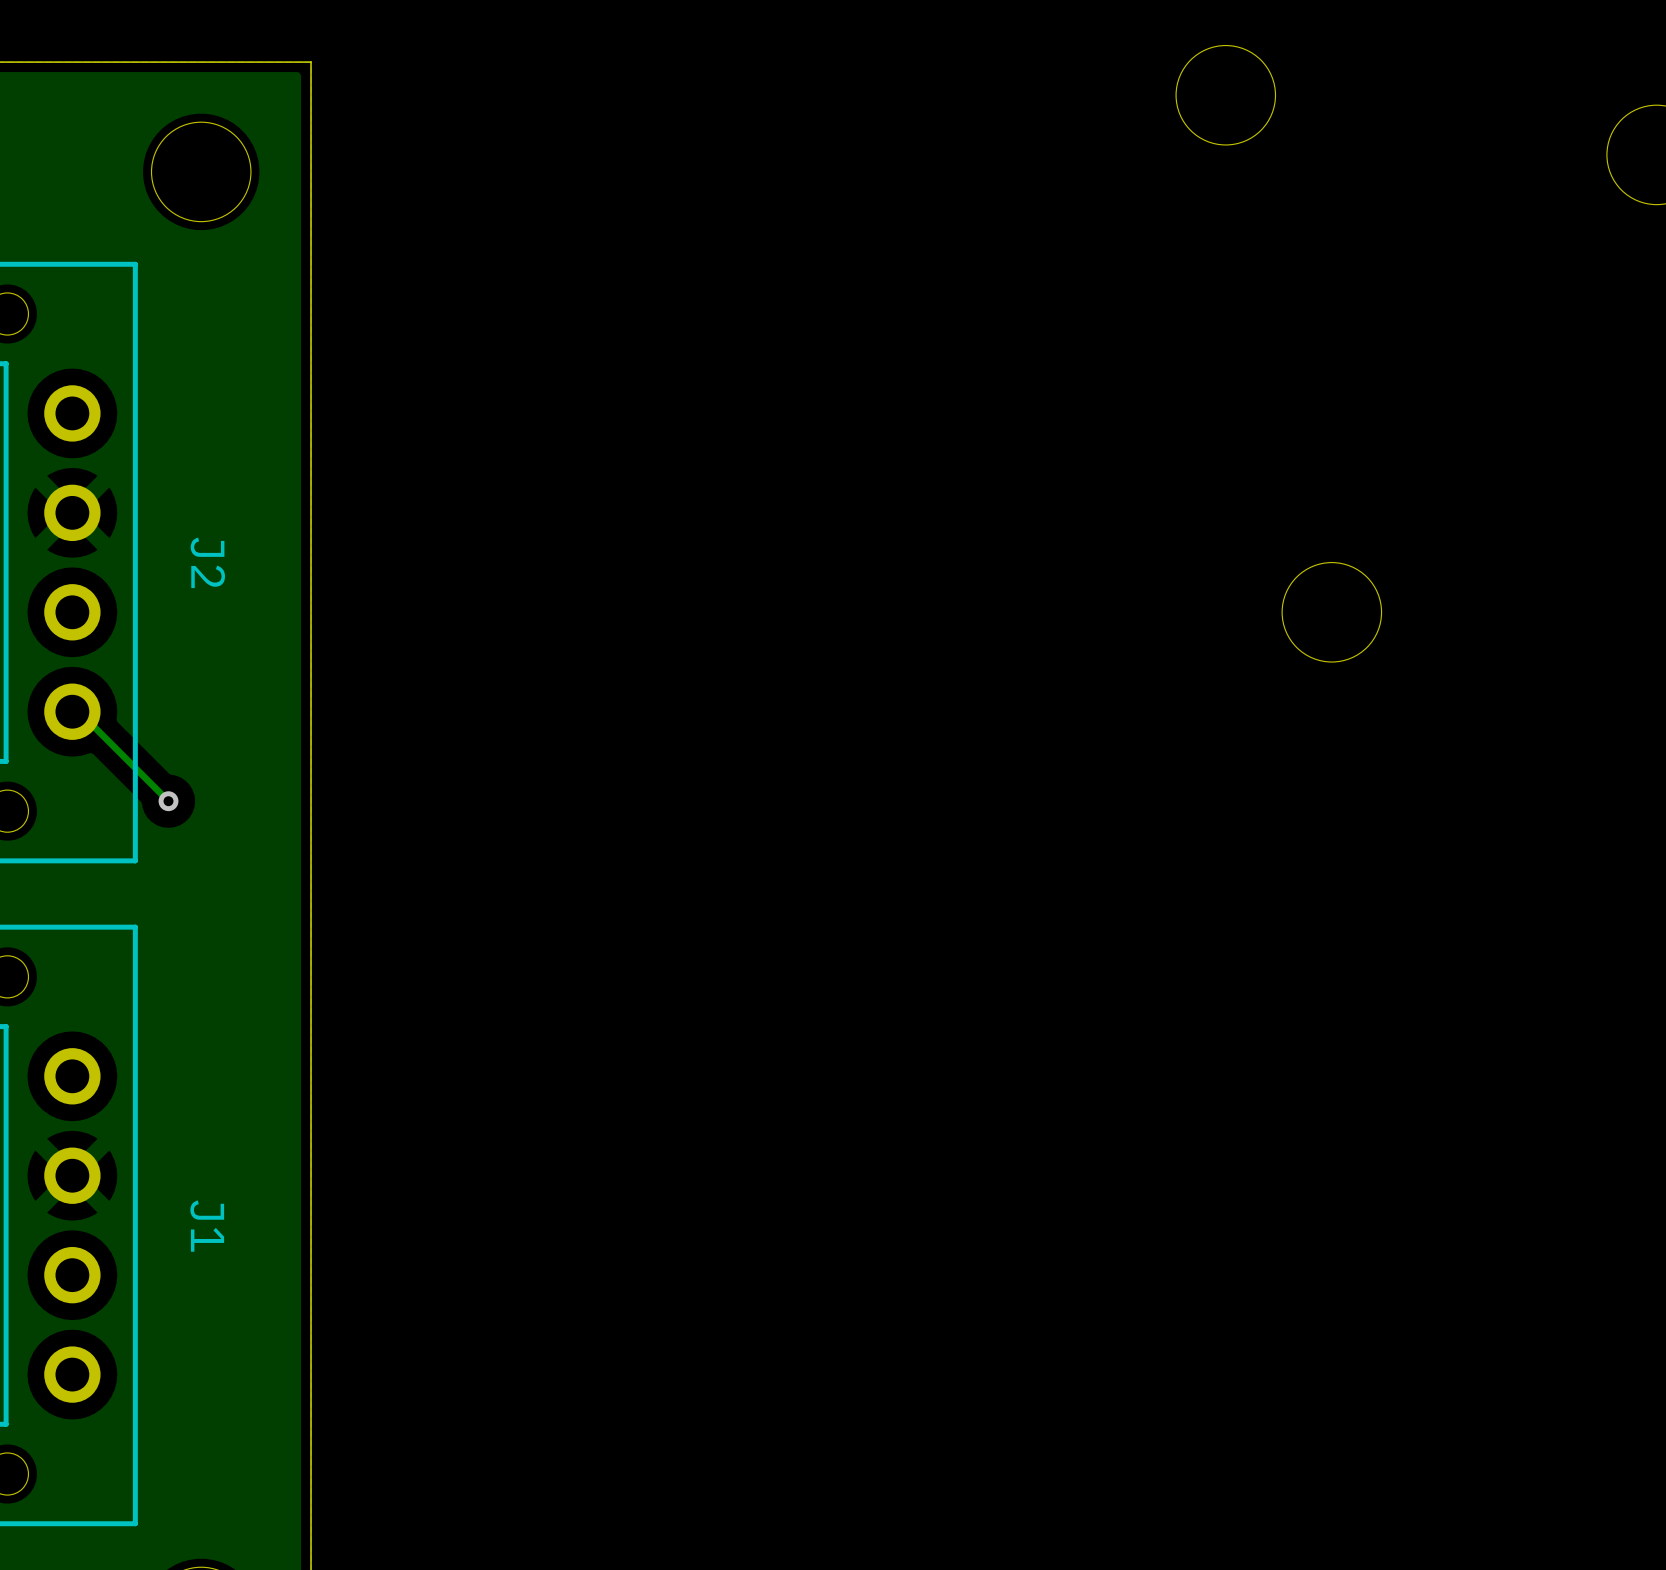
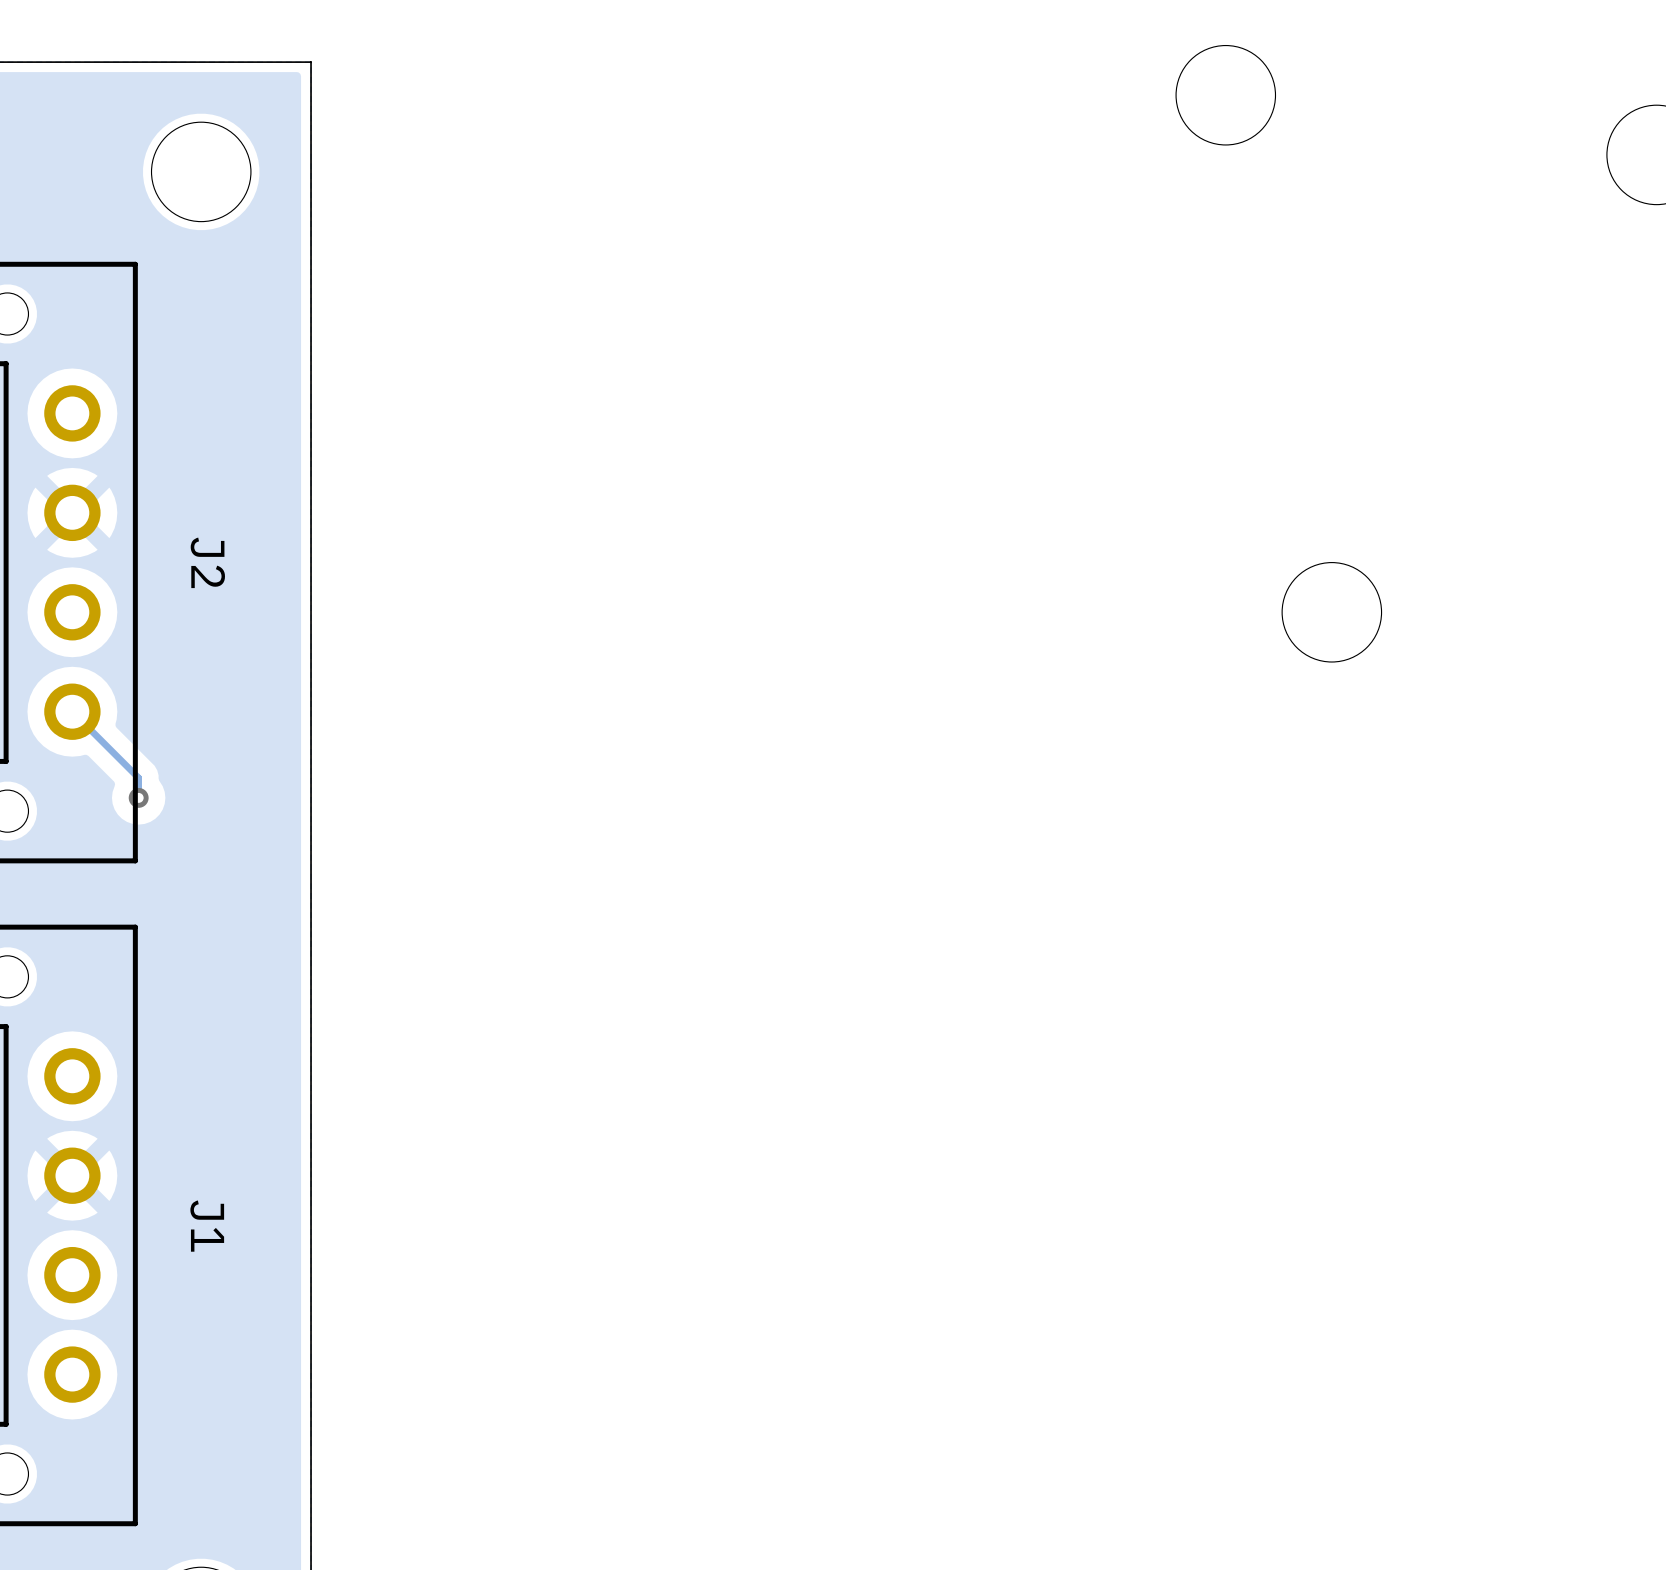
track: (72, 711) (79, 711) (168, 801) -> (72, 711) (138, 778) (138, 797)
via position: (168, 801) -> (138, 797)

